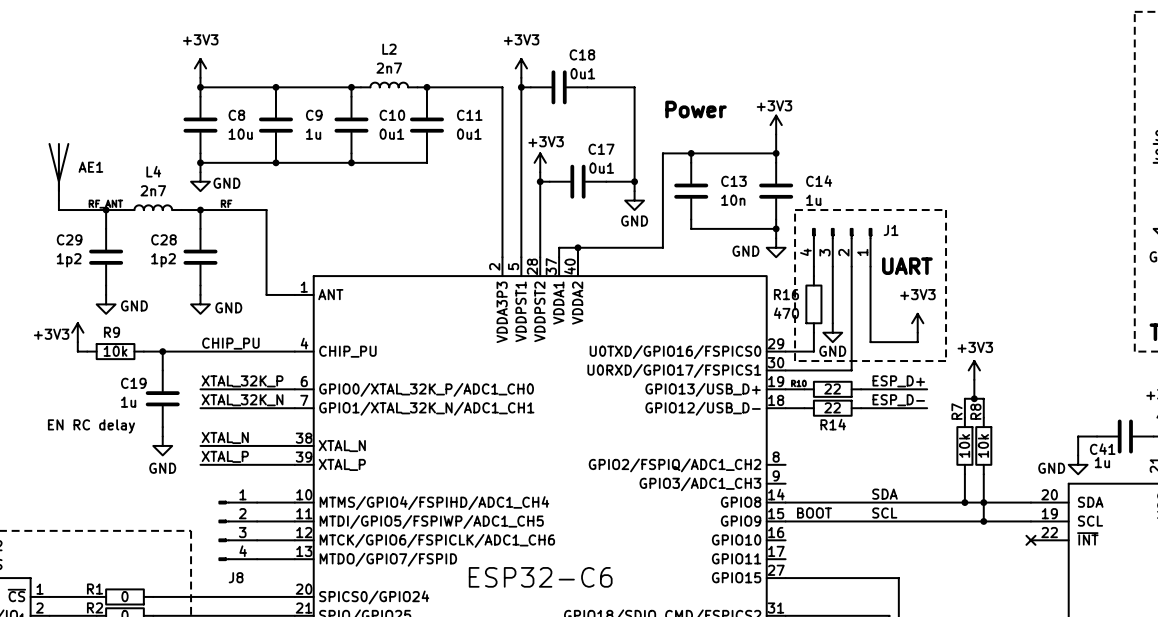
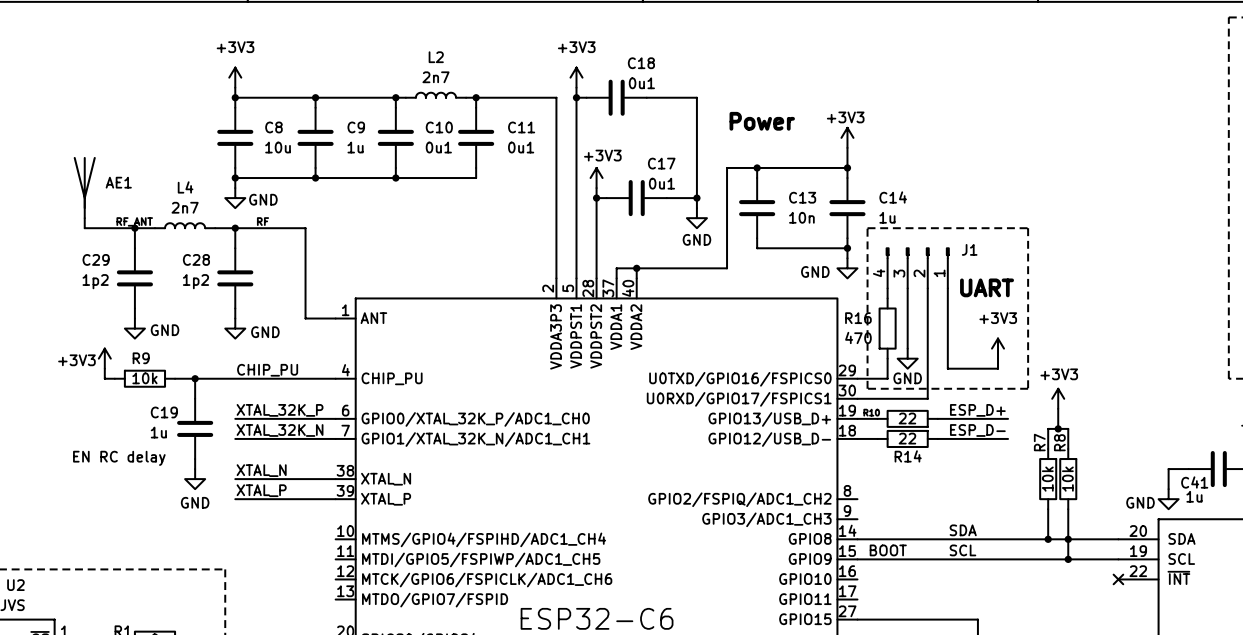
wire: (257, 502) (294, 502) -> none
wire: (257, 521) (294, 521) -> none
J8: (237, 530) -> none
wire: (257, 540) (294, 540) -> none
wire: (257, 559) (294, 559) -> none

